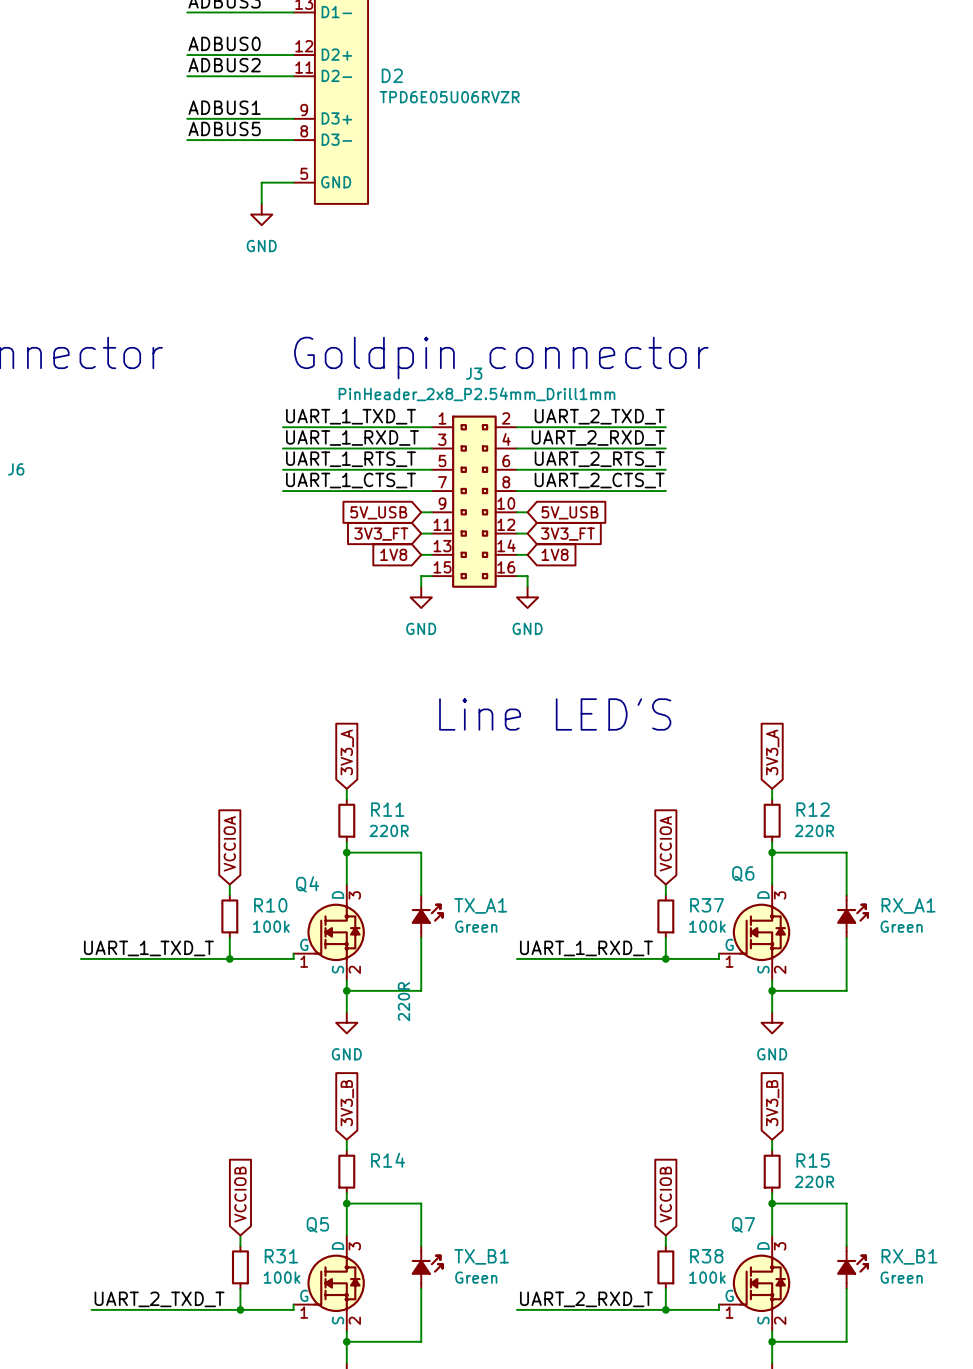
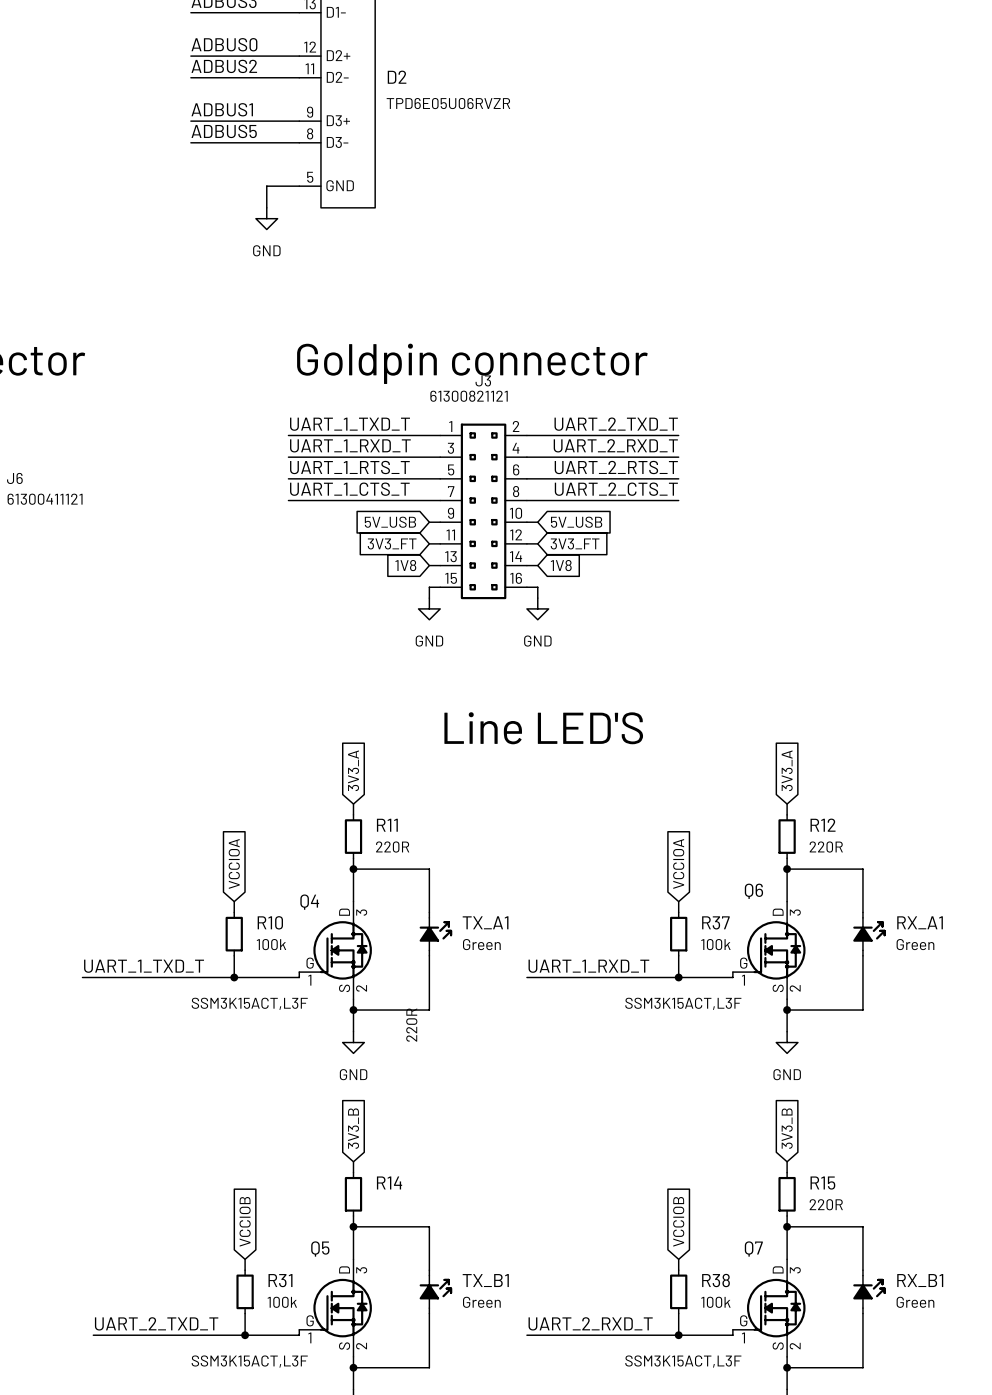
D2 value: TPD6E05U06RVZR (449, 97) -> none
D2 text: none -> TPD6E05U06RVZR (448, 103)
J3 text: none -> 61300821121 (469, 396)
J3 value: PinHeader_2x8_P2.54mm_Drill1mm (477, 394) -> none
J6 text: none -> 61300411121 (45, 499)
Q4 text: none -> SSM3K15ACT,L3F (249, 1003)
Q6 text: none -> SSM3K15ACT,L3F (683, 1003)
Q5 text: none -> SSM3K15ACT,L3F (249, 1361)
Q7 text: none -> SSM3K15ACT,L3F (683, 1361)

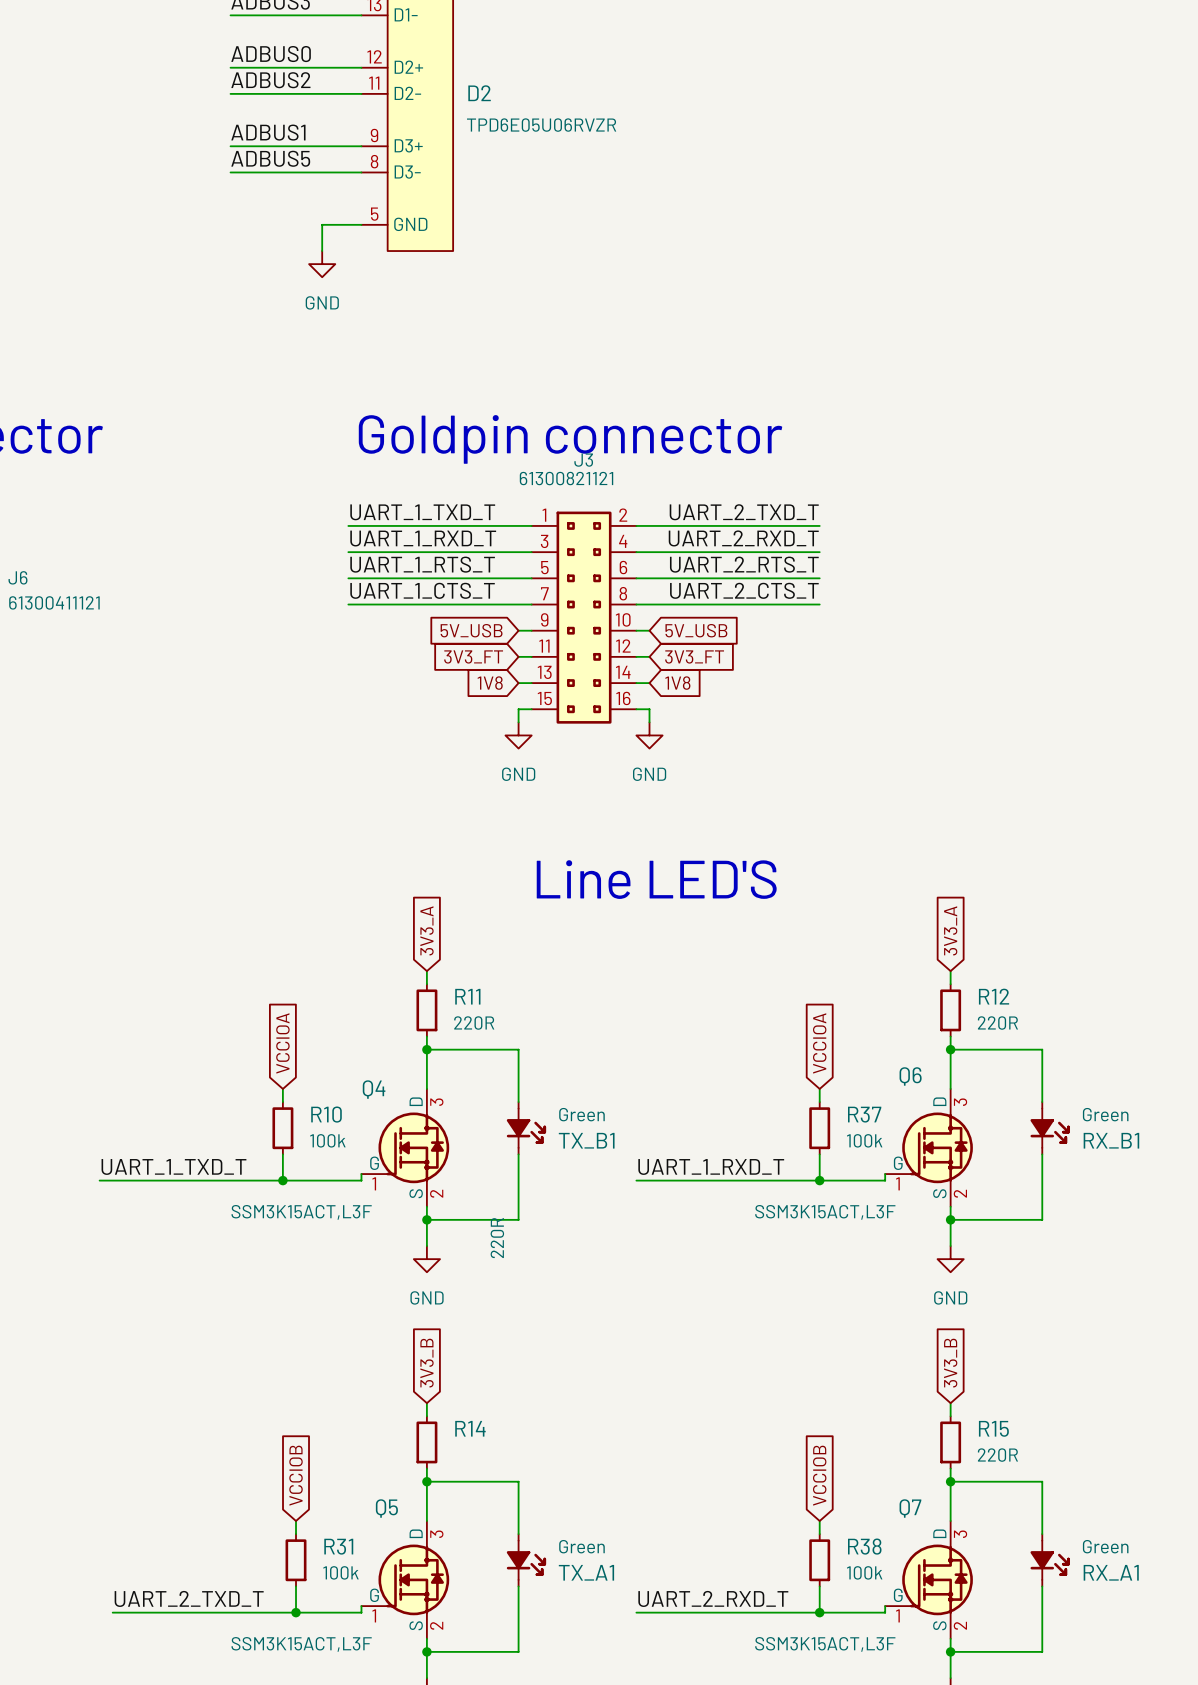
TX_A1 flip: as is (435, 934) -> up-down (526, 1560)
TX_A1 position: (435, 934) -> (526, 1560)
RX_A1 flip: as is (869, 934) -> up-down (1050, 1560)
RX_A1 position: (869, 934) -> (1050, 1560)
TX_B1 flip: as is (435, 1291) -> up-down (526, 1128)
TX_B1 position: (435, 1291) -> (526, 1128)
RX_B1 flip: as is (869, 1291) -> up-down (1050, 1128)
RX_B1 position: (869, 1291) -> (1050, 1128)

